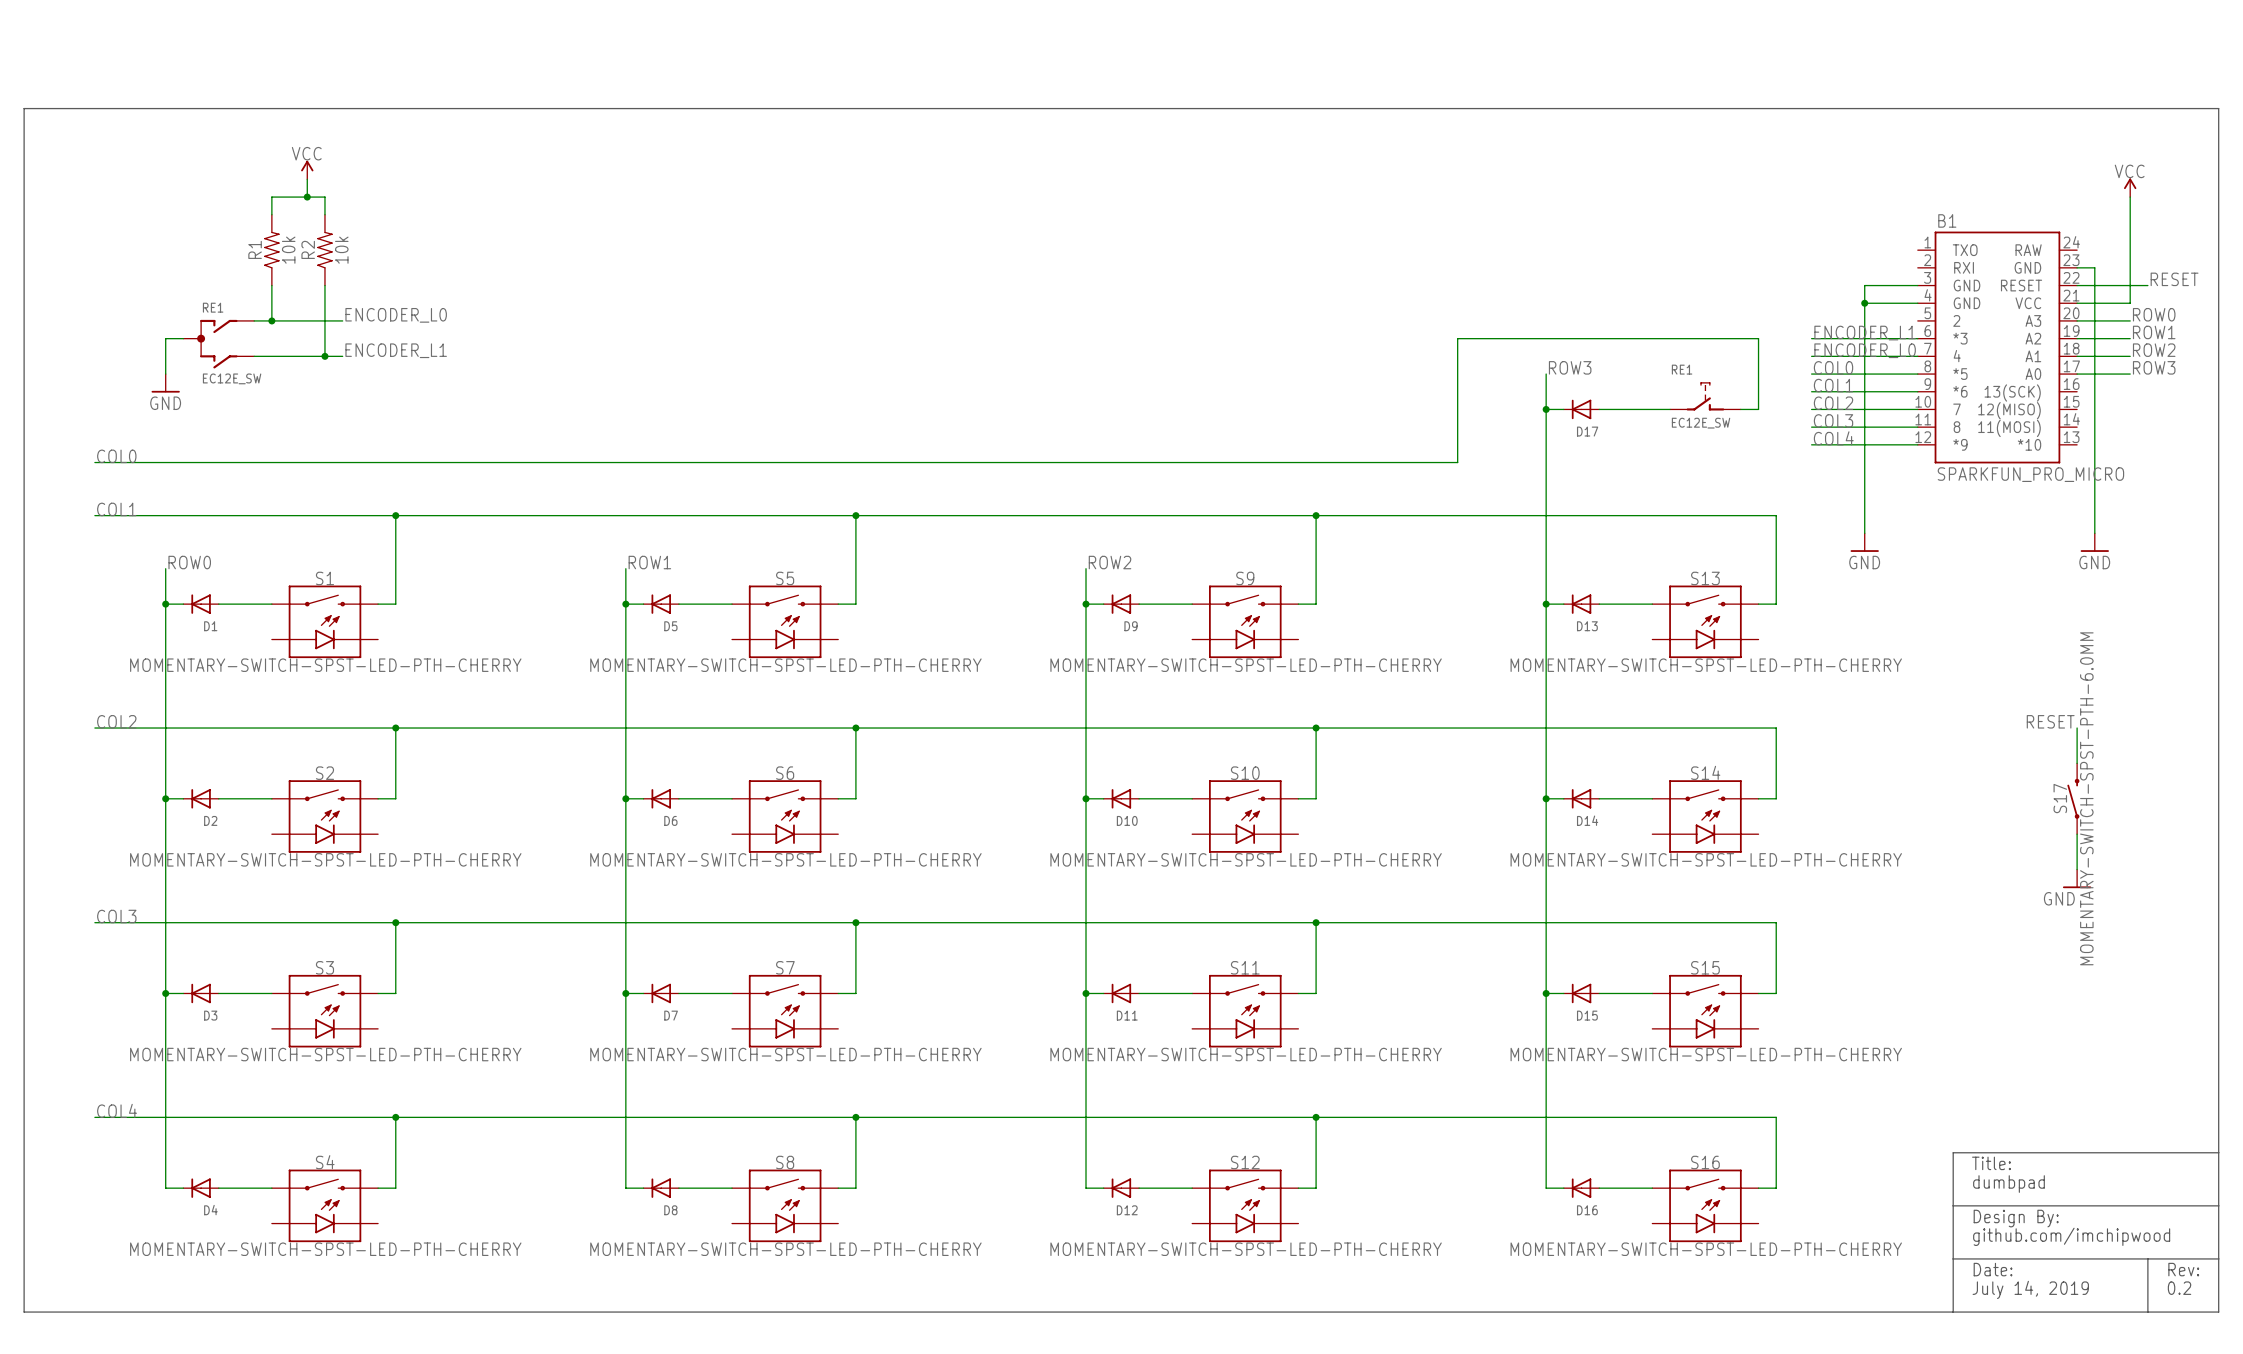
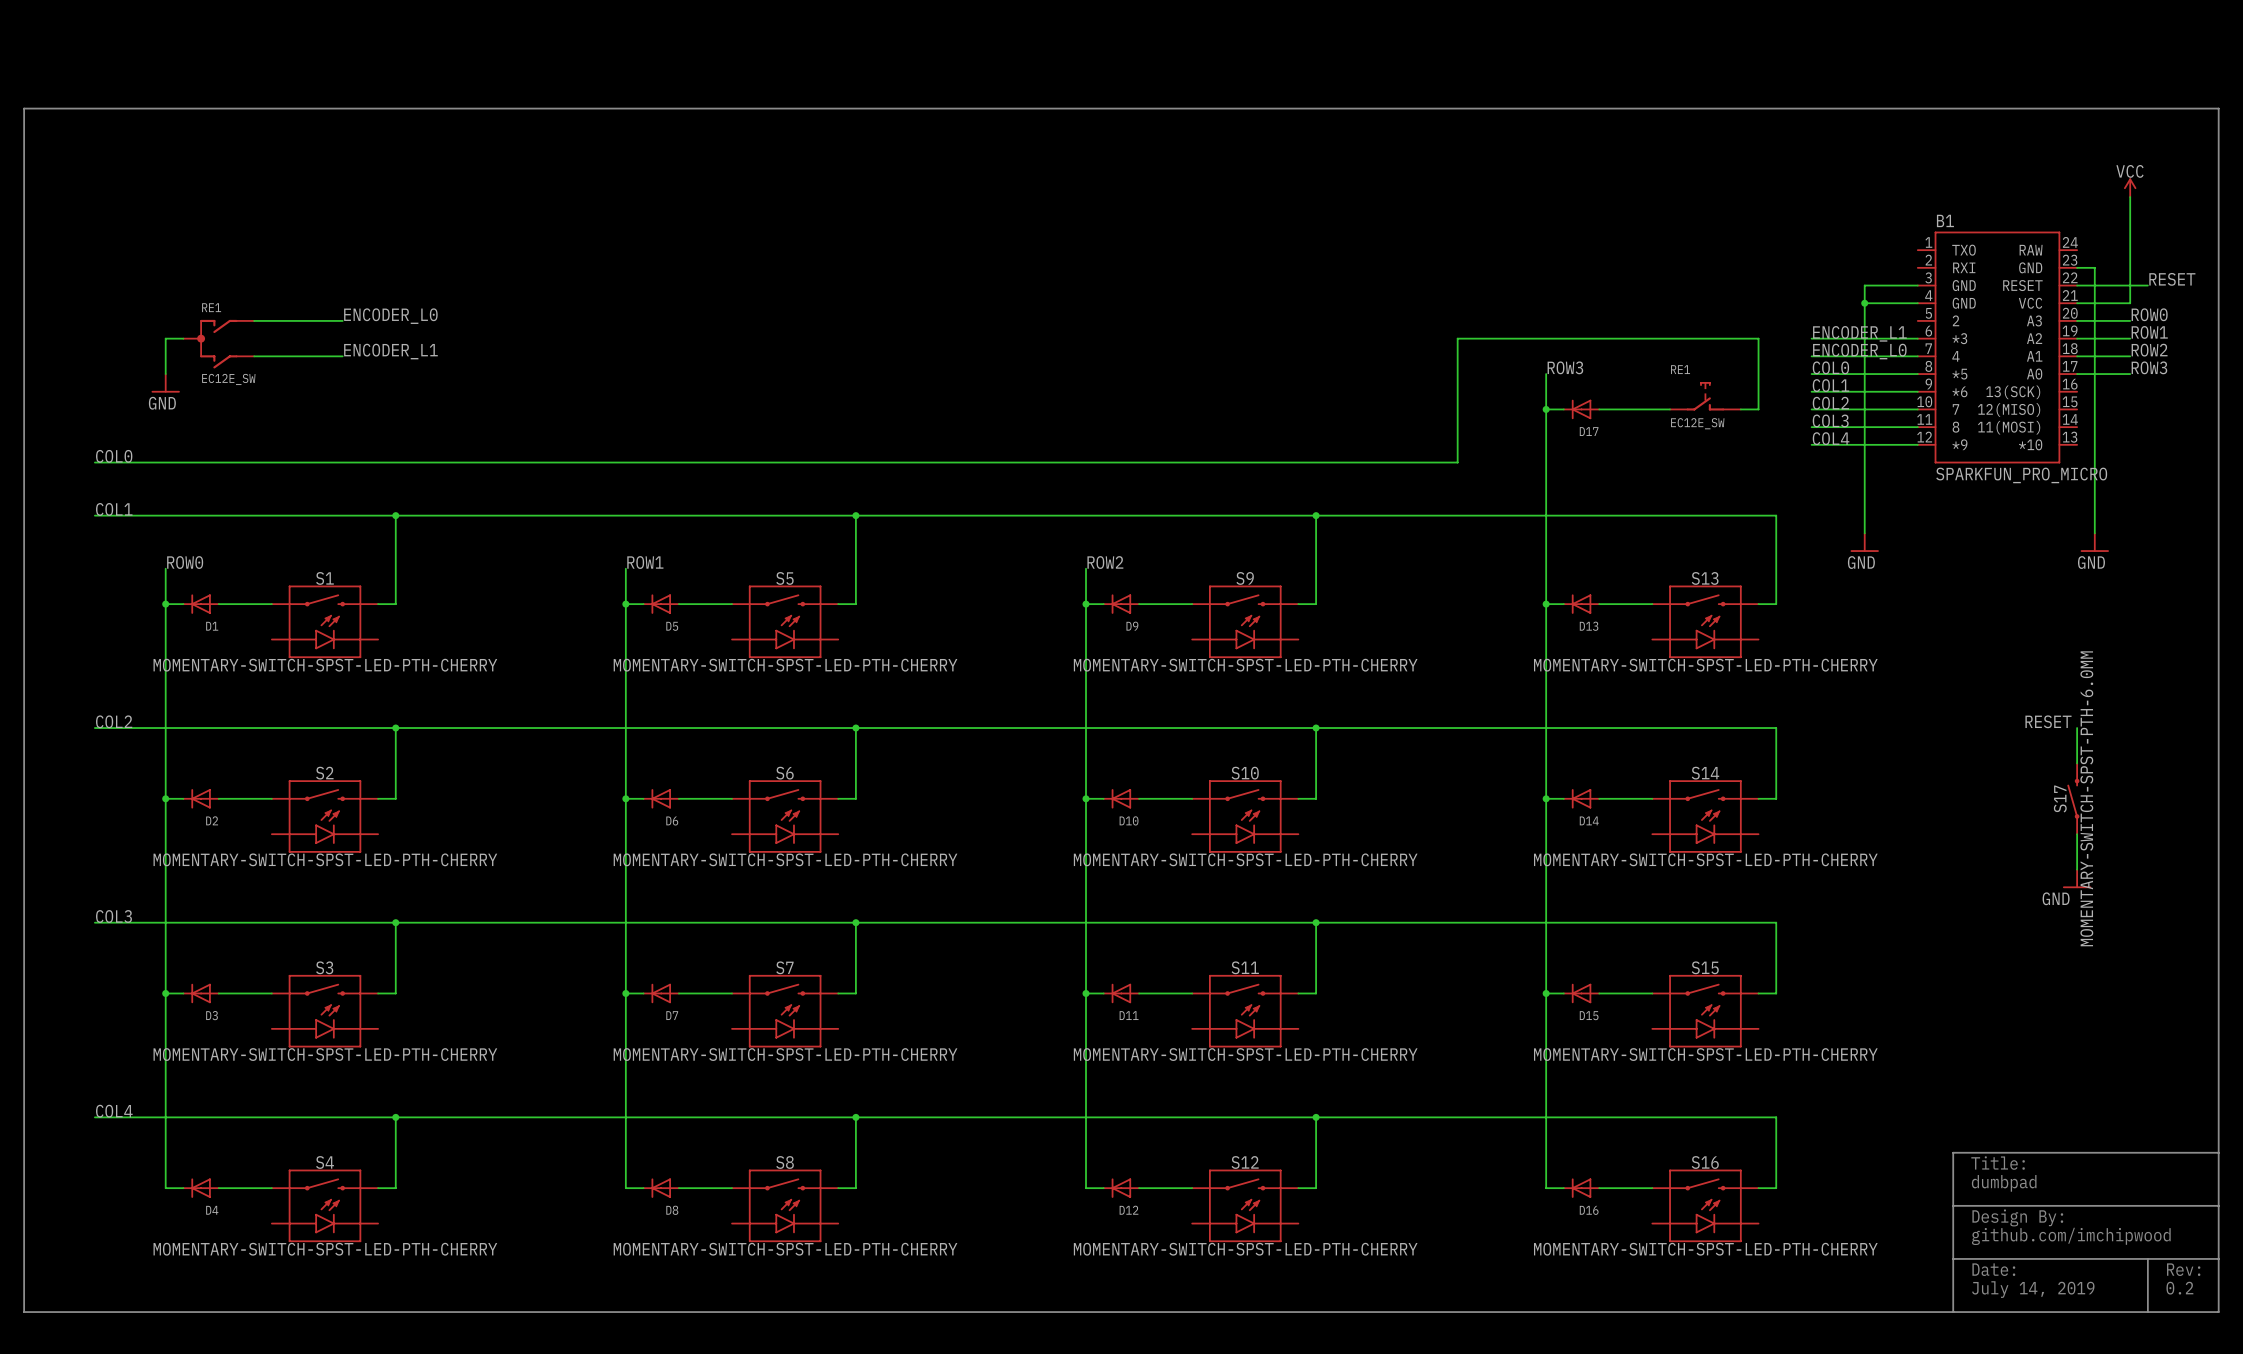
power symbol: VCC (307, 170) -> none
wire: (307, 179) (307, 197) -> none
junction: (307, 197) -> none
wire: (271, 214) (271, 197) (324, 197) (324, 214) -> none
R1: 10k (271, 250) -> none
R2: 10k (324, 250) -> none
wire: (271, 285) (271, 320) -> none
wire: (324, 285) (324, 356) -> none
junction: (271, 320) -> none
junction: (324, 356) -> none

